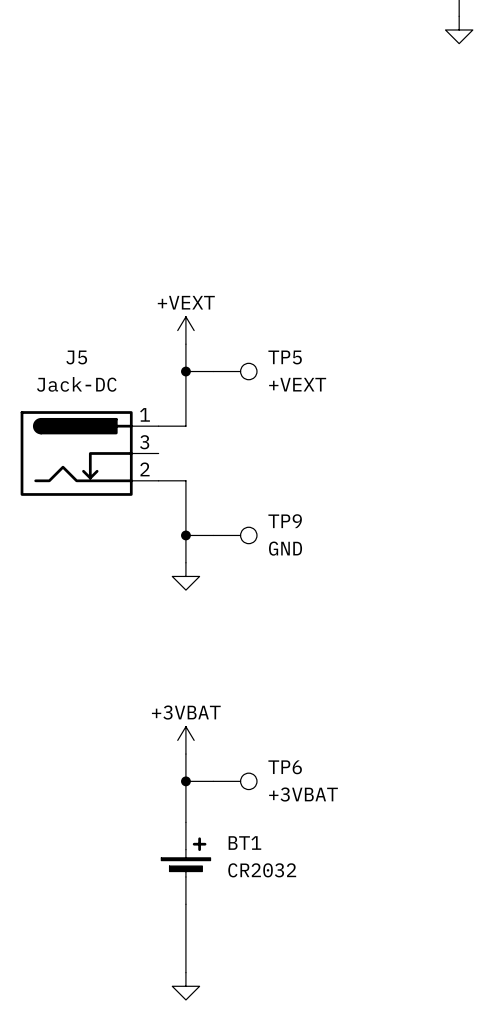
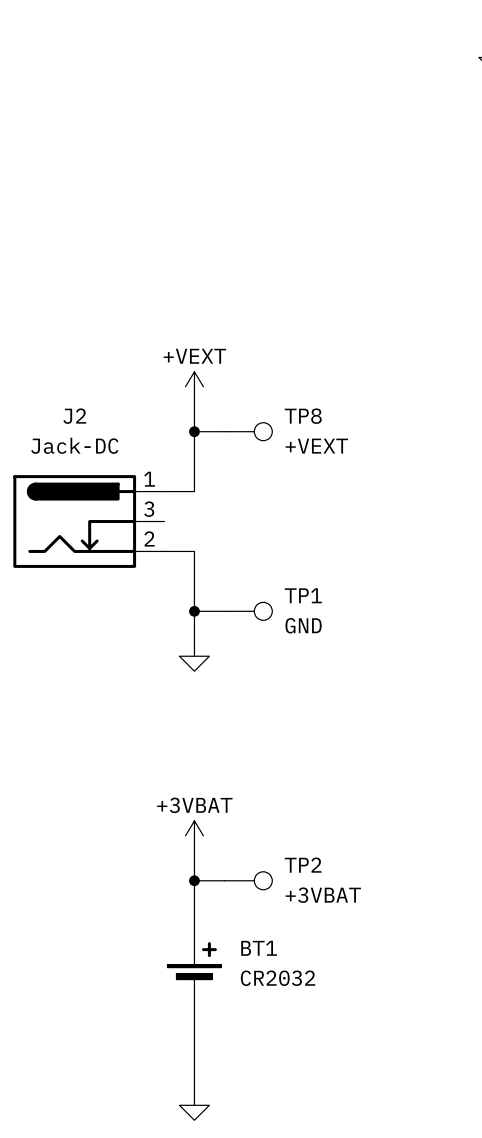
J5 name: J5 (76, 357) -> J2 (74, 416)
TP5 name: TP5 (285, 357) -> TP8 (303, 416)
TP9 name: TP9 (285, 521) -> TP1 (303, 595)
TP6 name: TP6 (285, 767) -> TP2 (303, 865)

